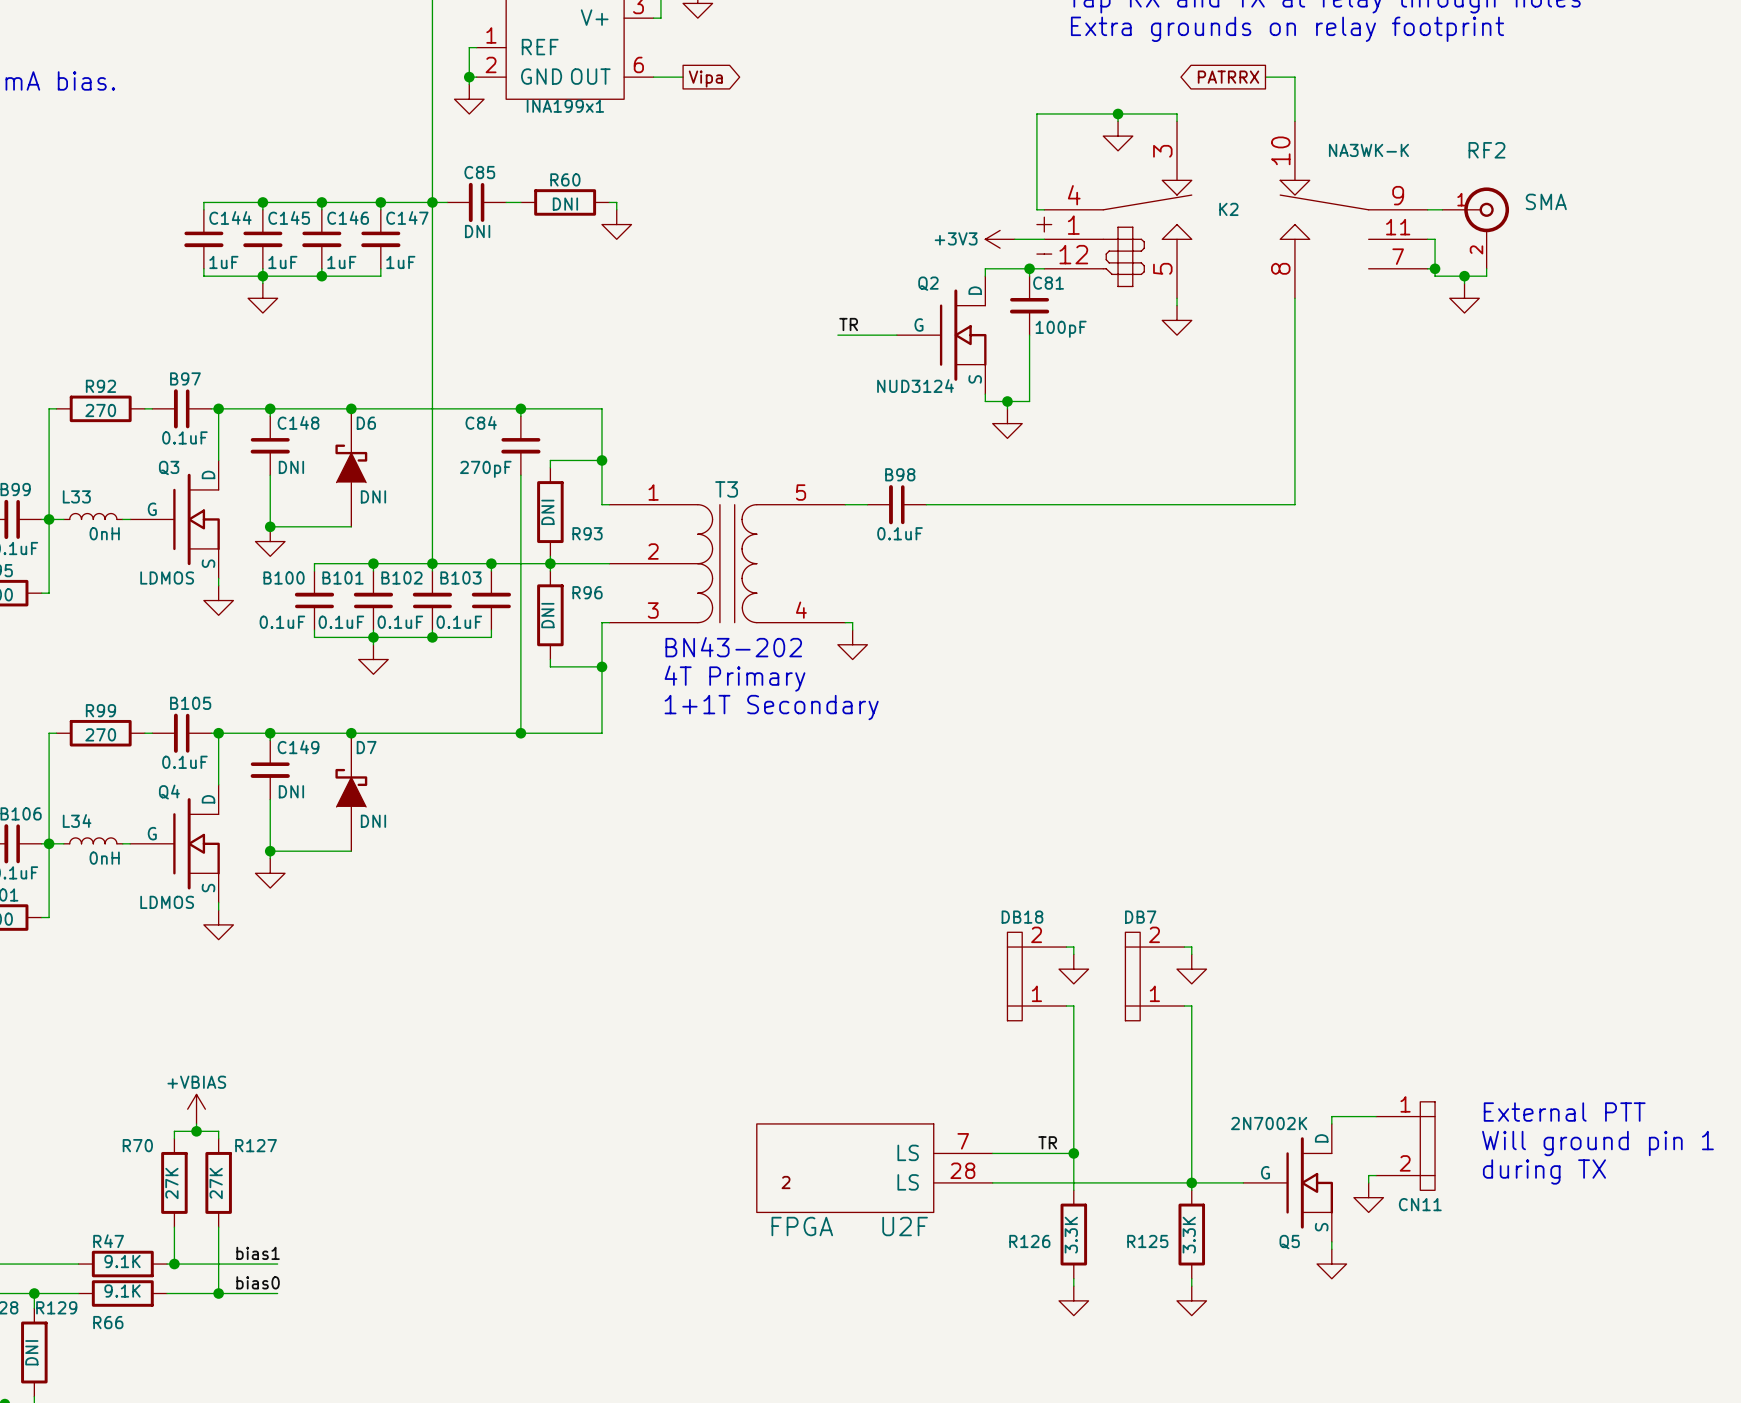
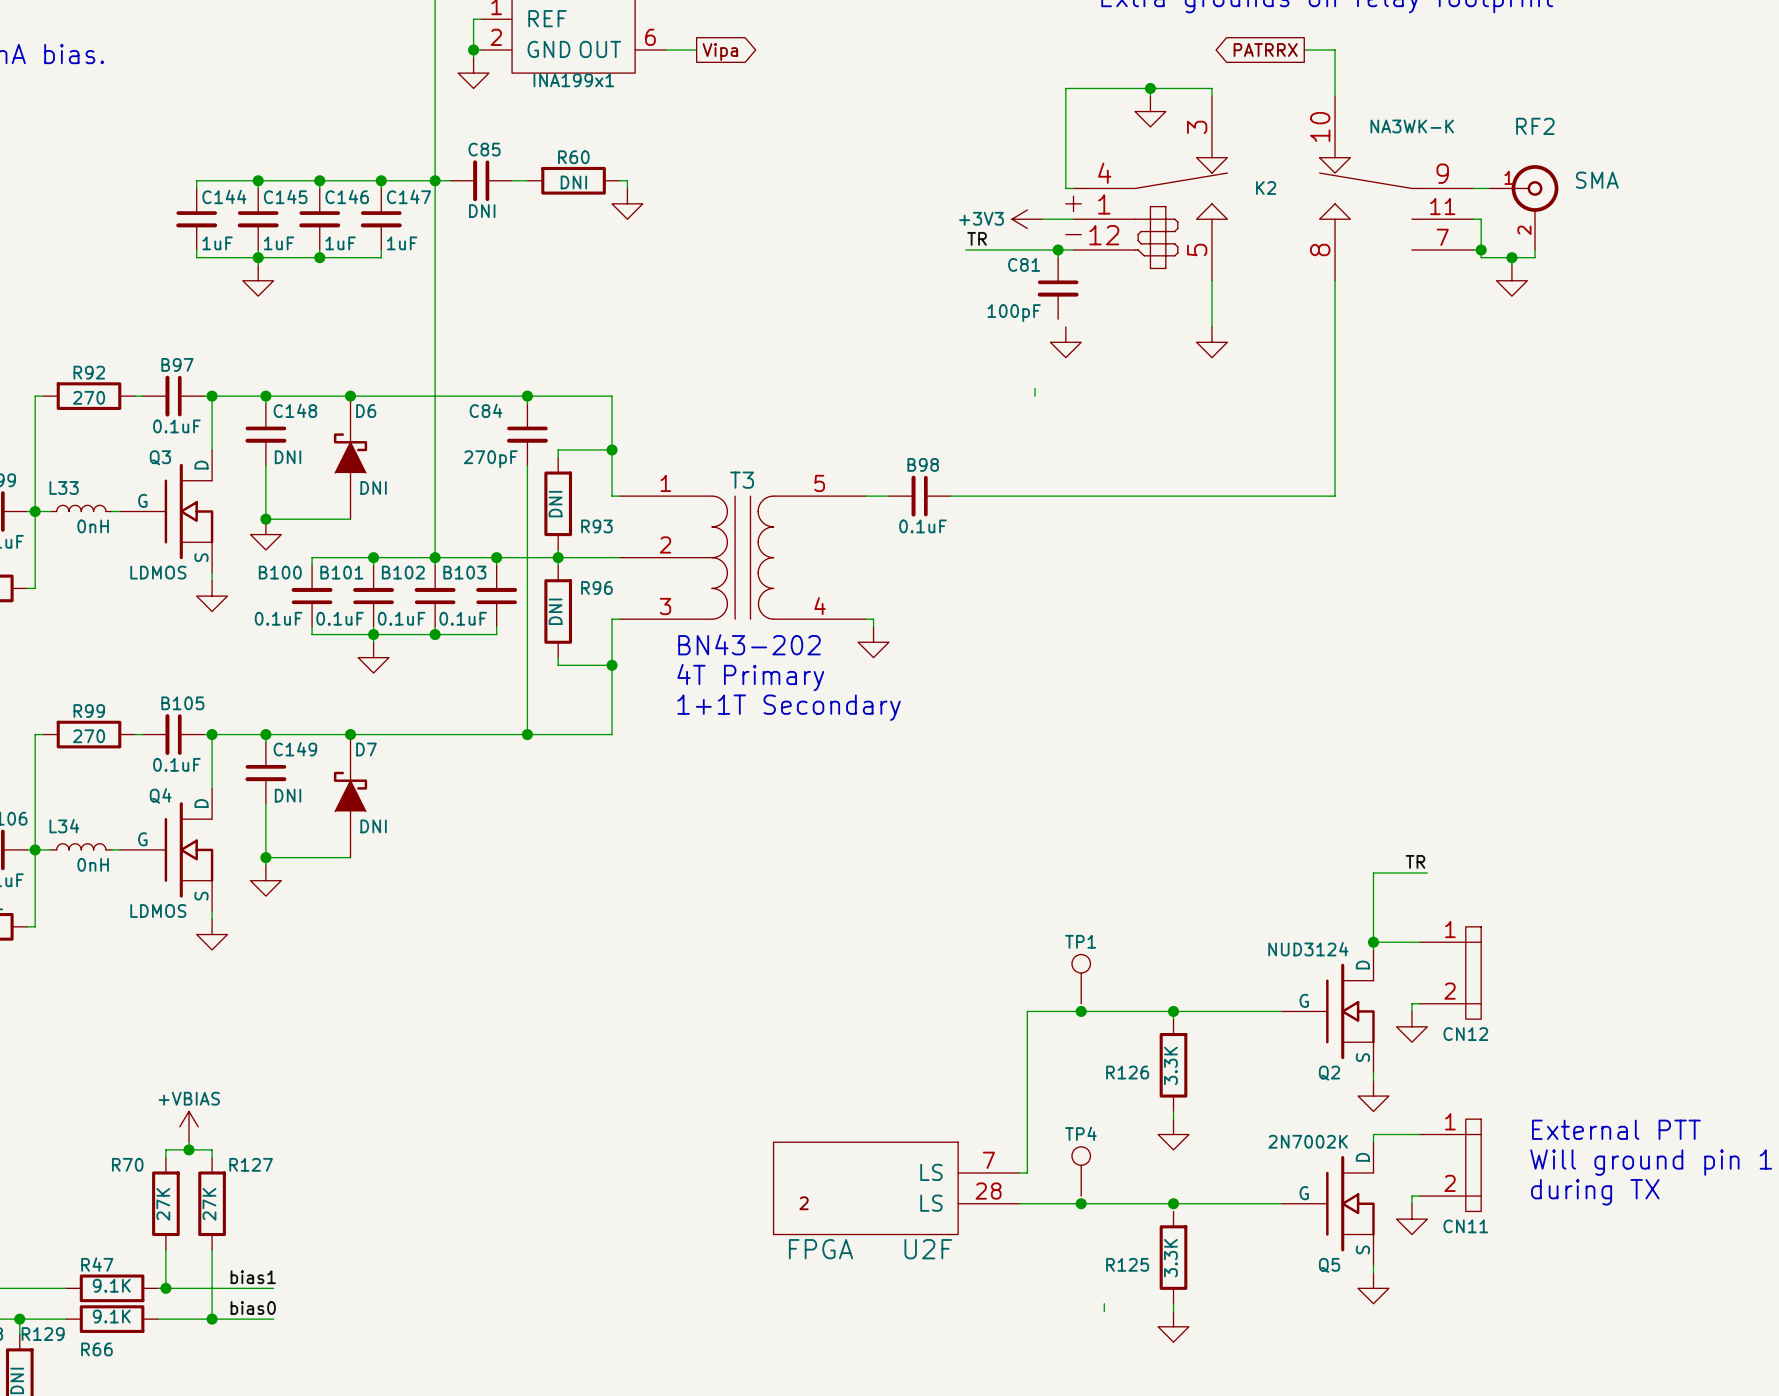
wire: (985, 268) (985, 276) -> (1011, 249) (965, 249)
Q2 name position: Q2 (928, 283) -> Q2 (1329, 1073)
C81 name position: C81 (1048, 283) -> C81 (1024, 264)
wire: none -> (1211, 288) (1211, 326)
power symbol position: (1177, 320) -> (1211, 342)
label position: TR (848, 324) -> TR (977, 238)
C81 value position: 100pF (1061, 329) -> 100pF (1014, 313)
wire: (837, 335) (896, 335) -> none
Q2 position: (941, 335) -> (1327, 1011)
wire: (1029, 335) (1029, 401) (985, 401) (985, 394) -> none
power symbol: none -> (1065, 342)
Q2 value position: NUD3124 (915, 386) -> NUD3124 (1308, 949)
junction: (1007, 401) -> none
power symbol: (1007, 423) -> none
label: none -> TR (1415, 861)
wire: none -> (1427, 873) (1373, 873) (1373, 949)
wire: none -> (1373, 942) (1419, 942)
junction: none -> (1373, 942)
wire: (1066, 947) (1073, 947) (1073, 954) -> none
wire: (1184, 947) (1191, 947) (1191, 954) -> none
CN12: none -> (1450, 973)
TP1: none -> (1081, 979)
power symbol: (1073, 969) -> none
power symbol: (1191, 969) -> none
DB18: (1036, 976) -> none
DB7: (1154, 976) -> none
wire: none -> (1419, 1003) (1411, 1003) (1411, 1011)
junction: none -> (1081, 1011)
junction: none -> (1173, 1011)
wire: (1066, 1006) (1073, 1006) (1073, 1190) -> none
wire: (1184, 1006) (1191, 1006) (1191, 1190) -> none
power symbol: none -> (1411, 1026)
wire: none -> (1373, 1072) (1373, 1080)
power symbol: none -> (1373, 1096)
wire: none -> (1173, 1111) (1173, 1119)
power symbol: none -> (1173, 1134)
label: TR (1047, 1142) -> none
TP4: none -> (1081, 1171)
wire: (1000, 1153) (1073, 1153) -> (1027, 1172) (1027, 1011) (1281, 1011)
junction: (1073, 1153) -> none
junction: none -> (1081, 1203)
junction: none -> (1173, 1203)
junction: (1191, 1182) -> none
R126 position: (1073, 1234) -> (1173, 1065)
R125 position: (1191, 1234) -> (1173, 1257)
wire: (1191, 1278) (1191, 1286) -> (1173, 1303) (1173, 1311)
power symbol: (1073, 1300) -> none
power symbol: none -> (1173, 1326)
power symbol: (1191, 1300) -> none

